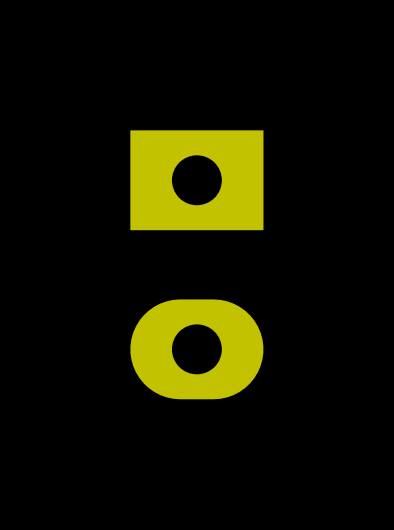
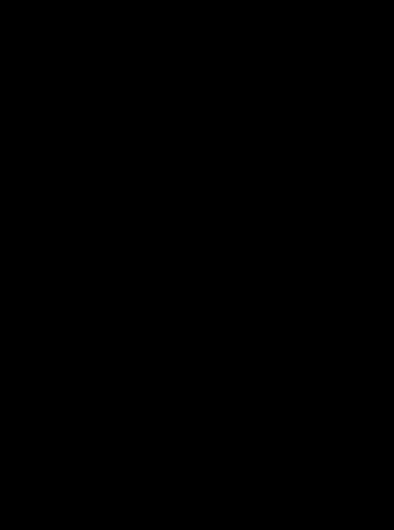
part: (196, 264) -> none

